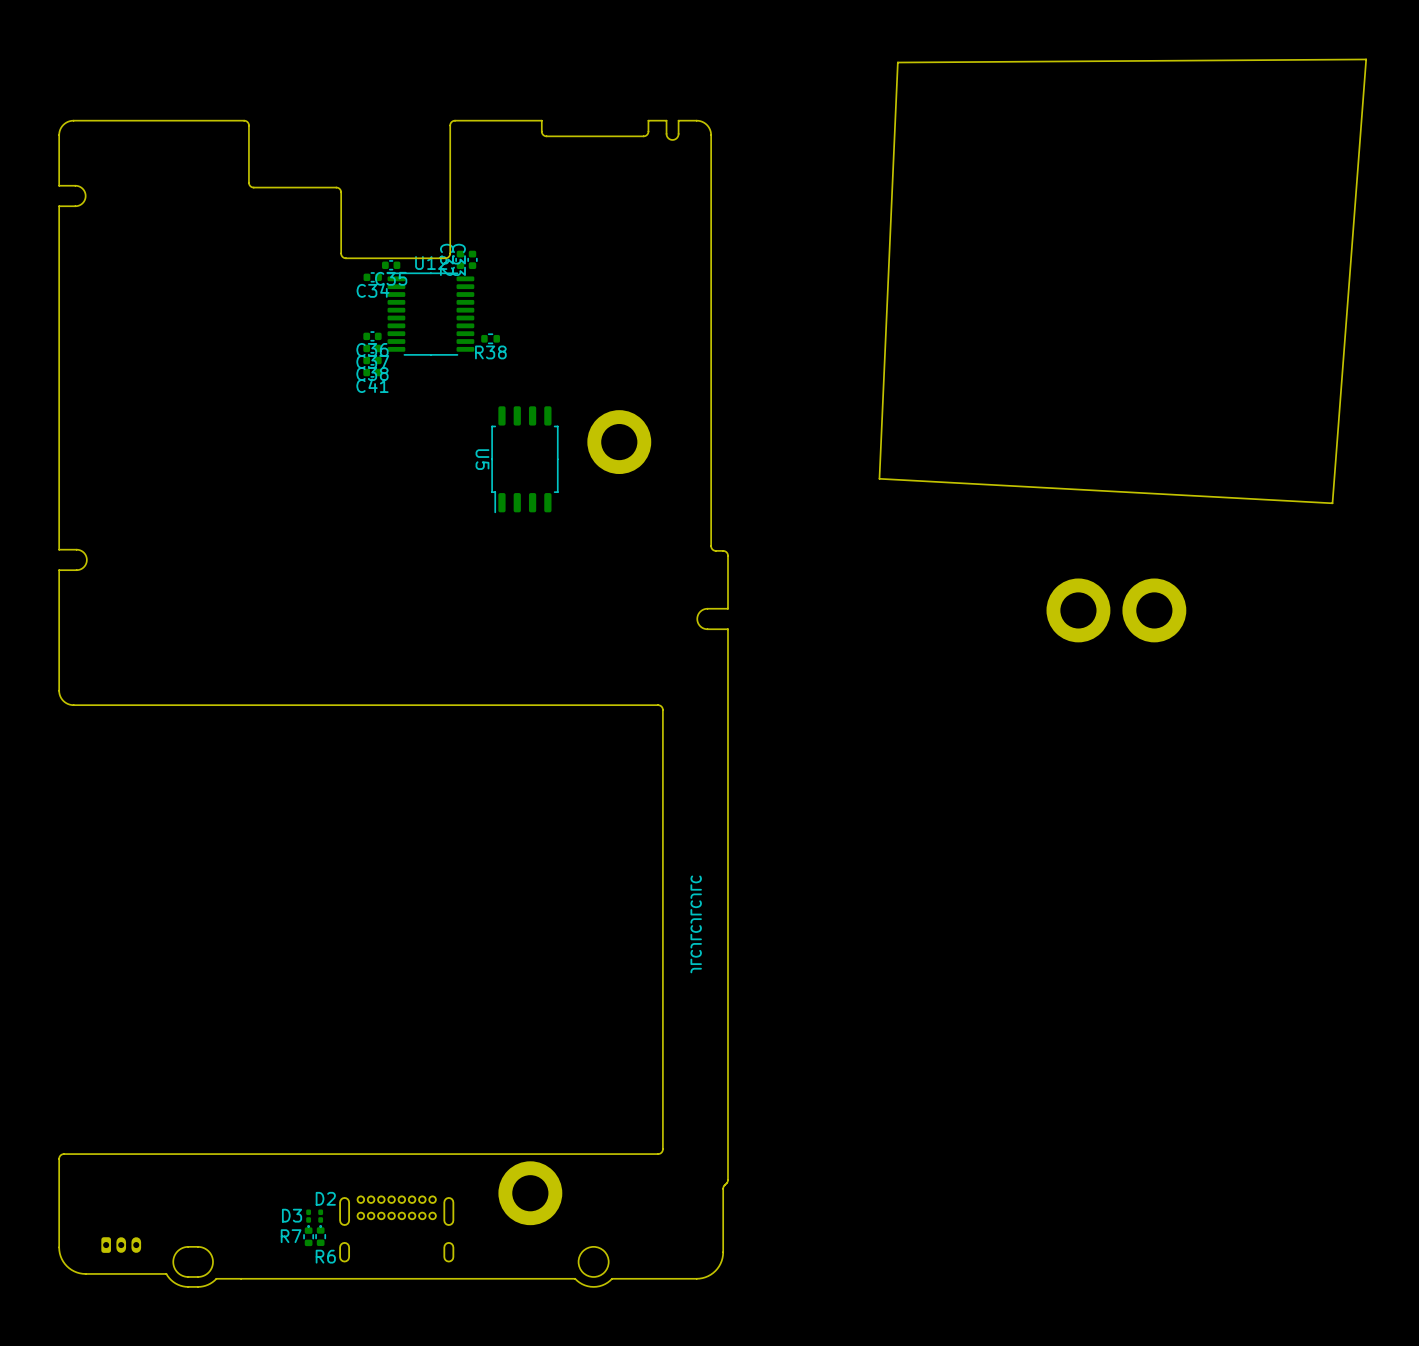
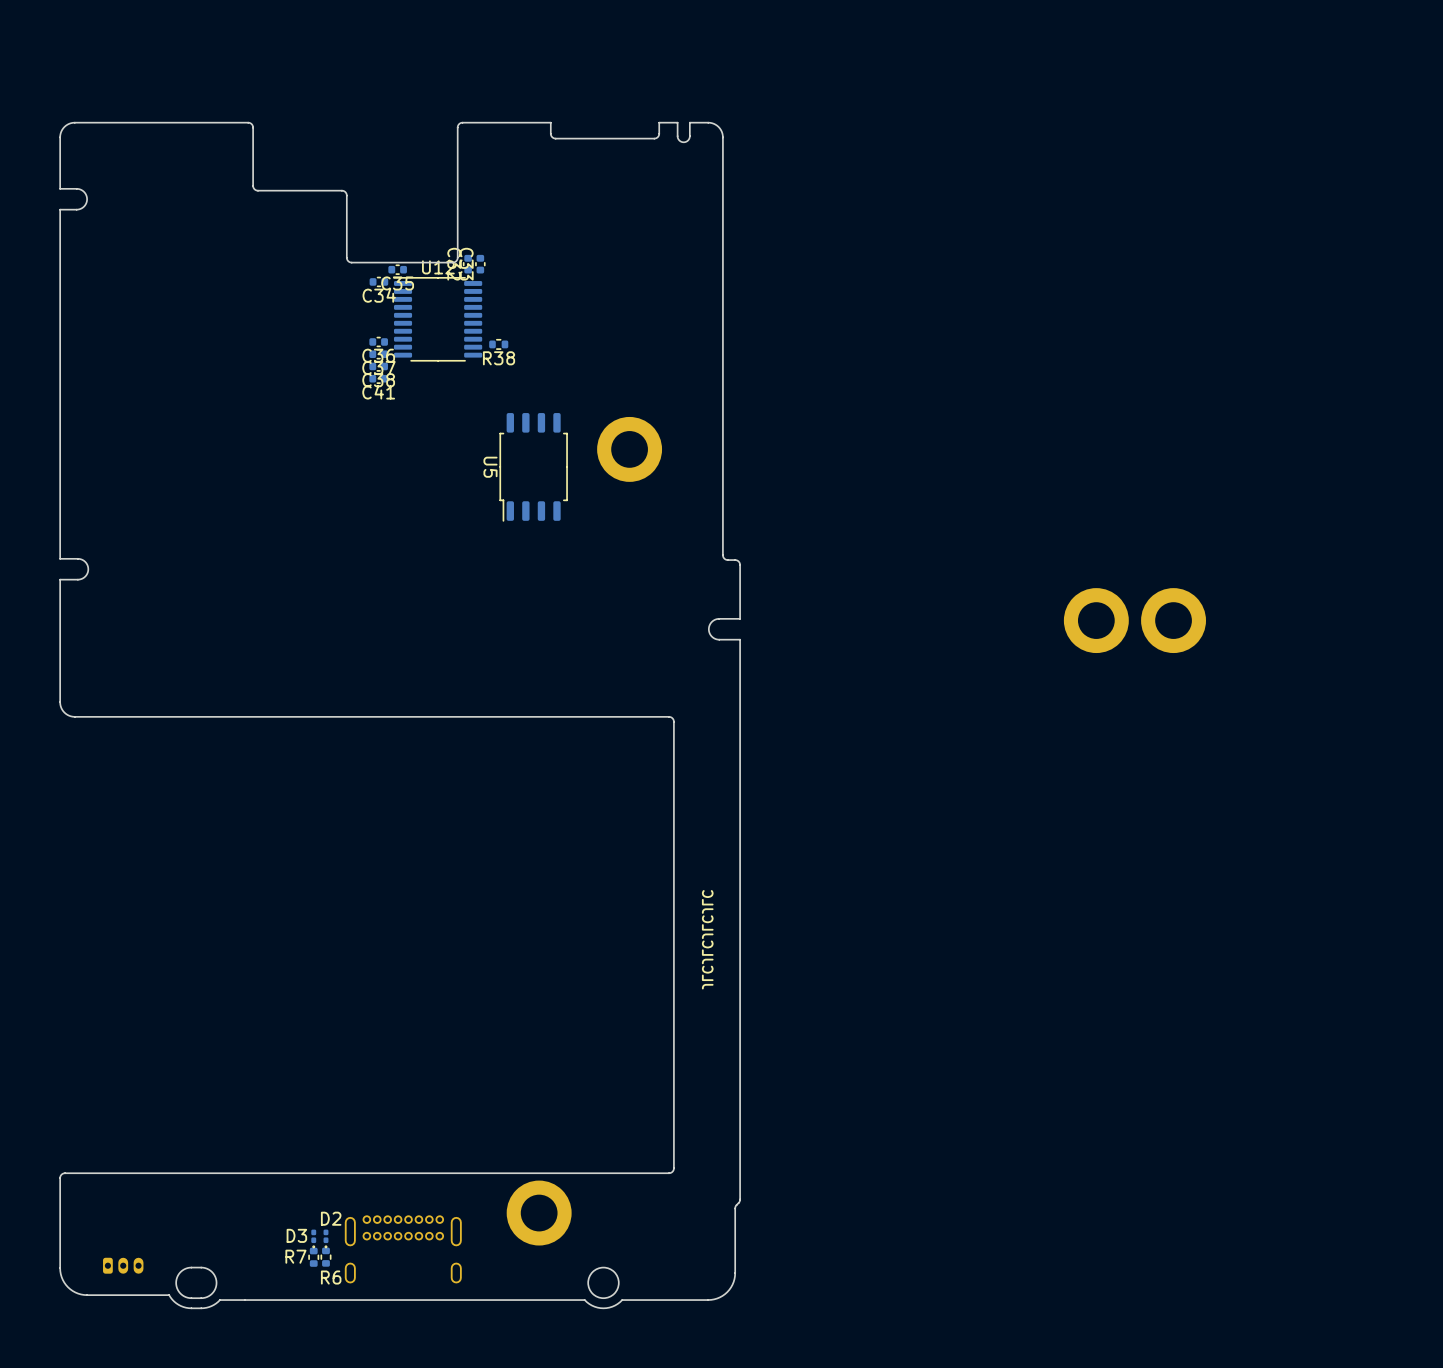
board edge: (1366, 59) (1332, 503) (879, 478) (897, 62) (1366, 59) -> none

